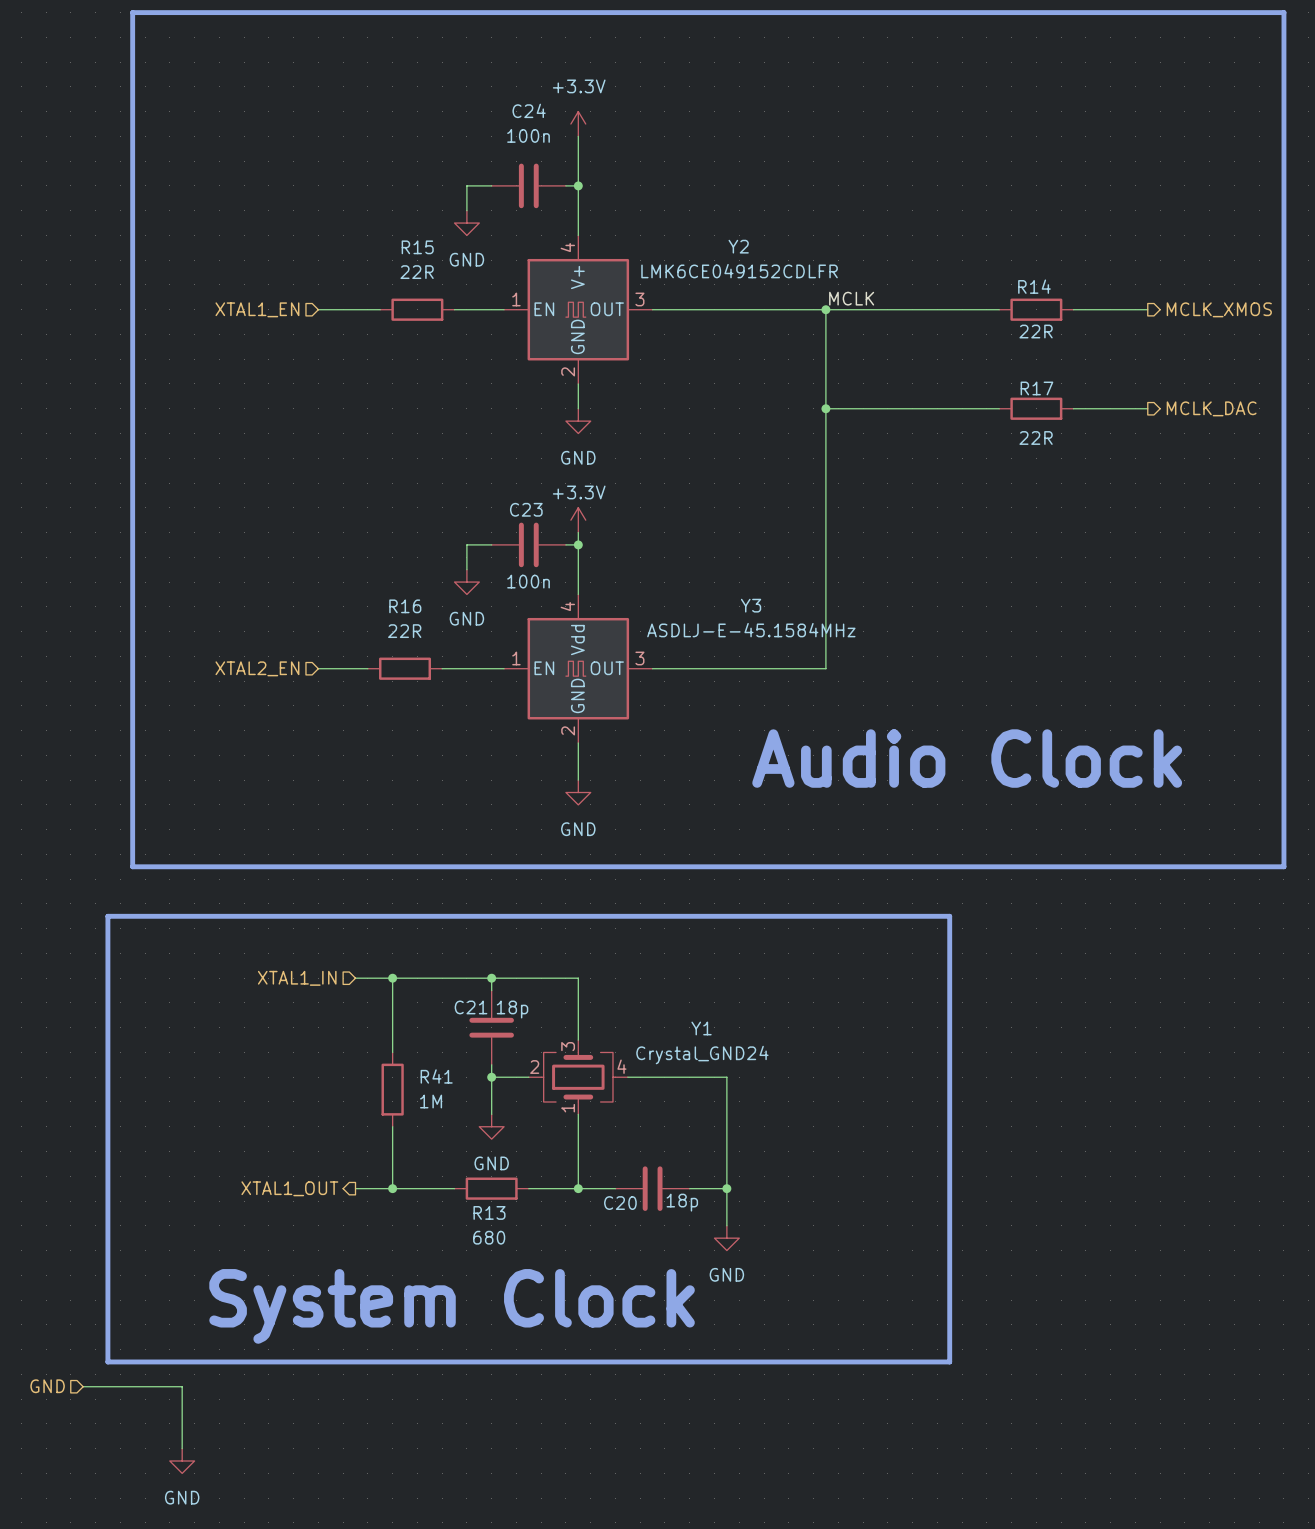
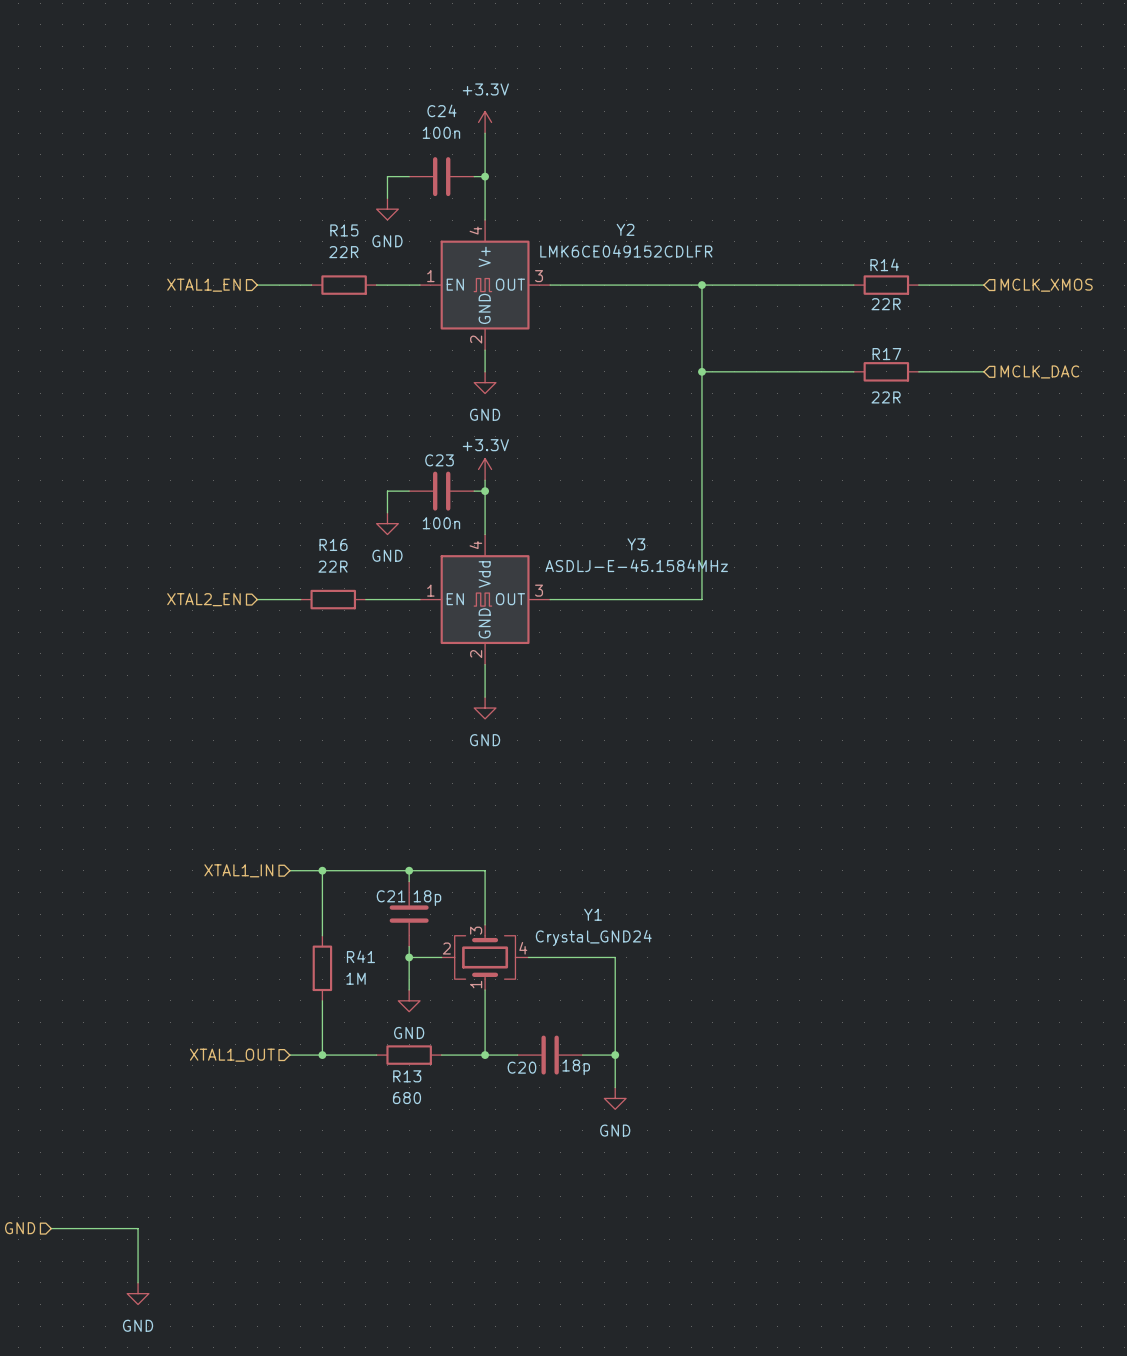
line: (132, 12) (1283, 12) (1283, 866) (132, 866) (132, 12) -> none
label: MCLK (851, 298) -> none
hierarchical label shape: output (1219, 309) -> input (1046, 285)
hierarchical label shape: output (1211, 408) -> input (1039, 371)
text: Audio Clock (967, 758) -> none
line: (107, 916) (949, 916) (949, 1361) (107, 1361) (107, 916) -> none
hierarchical label shape: output (289, 1188) -> input (232, 1055)
text: System Clock (452, 1306) -> none

